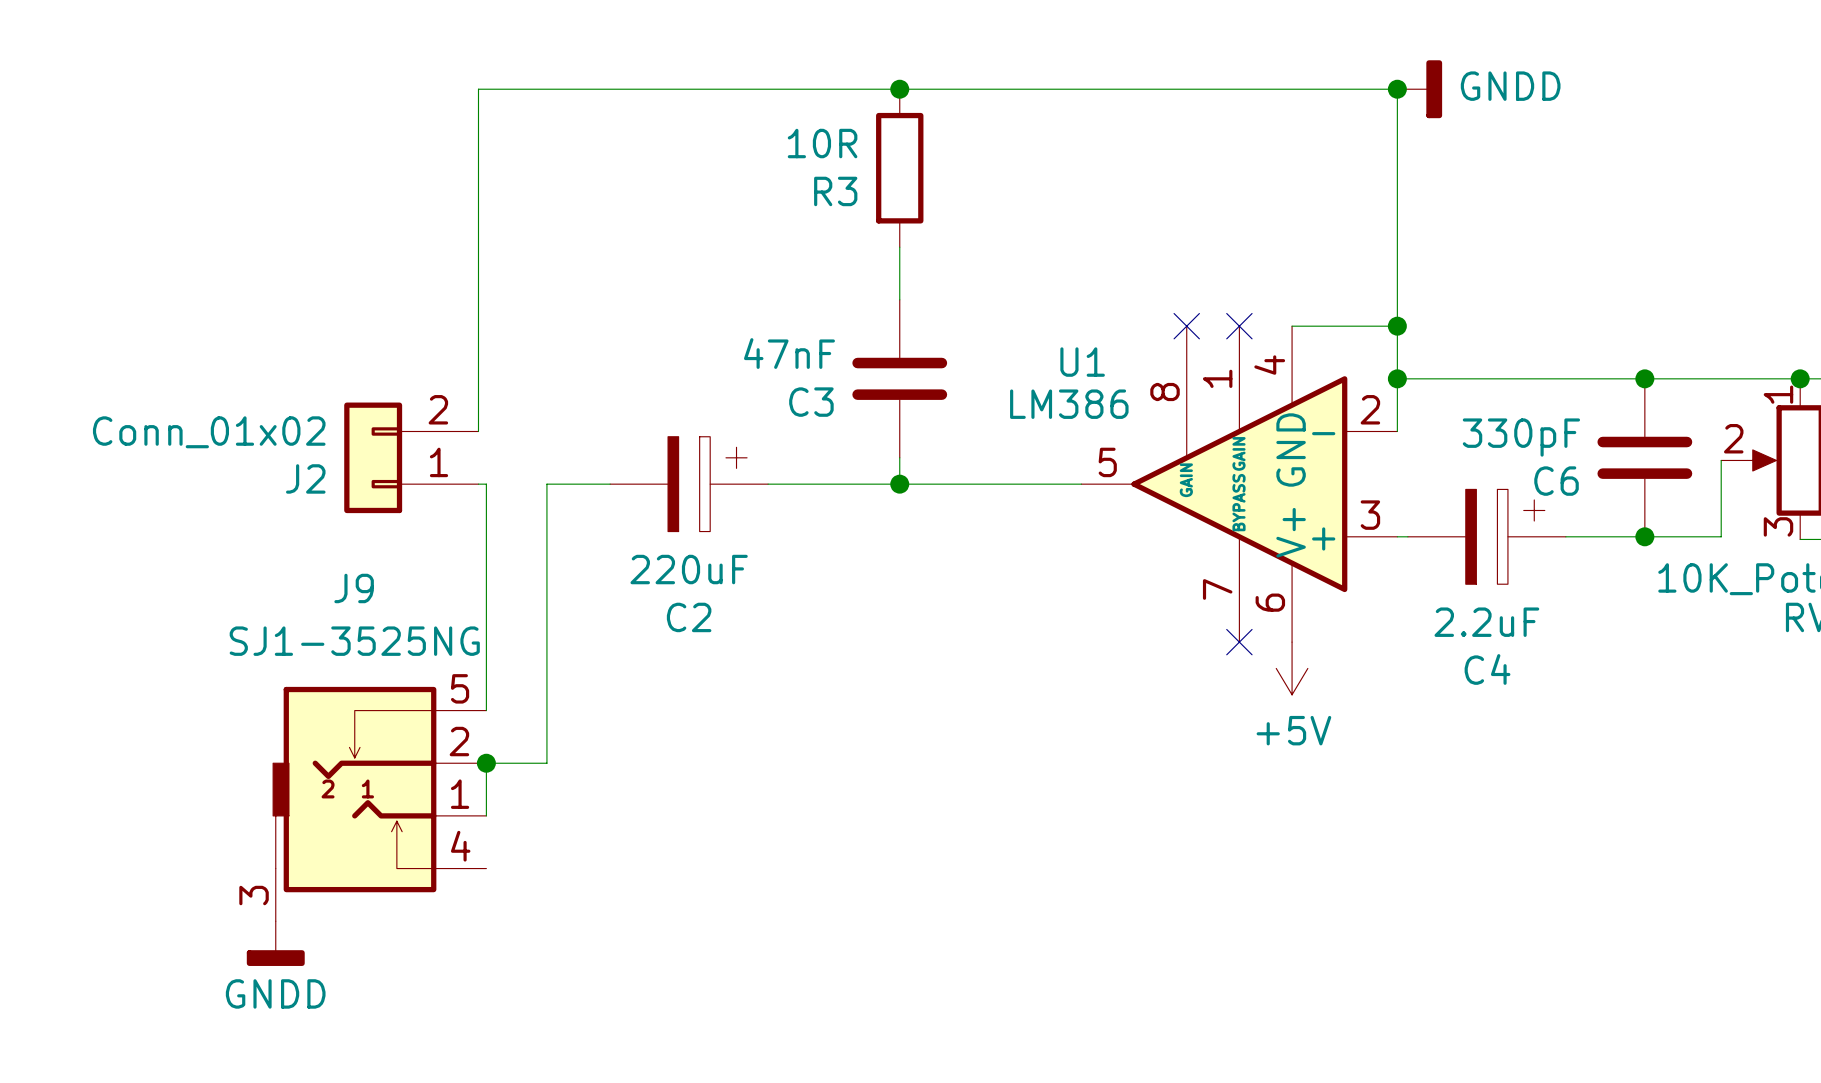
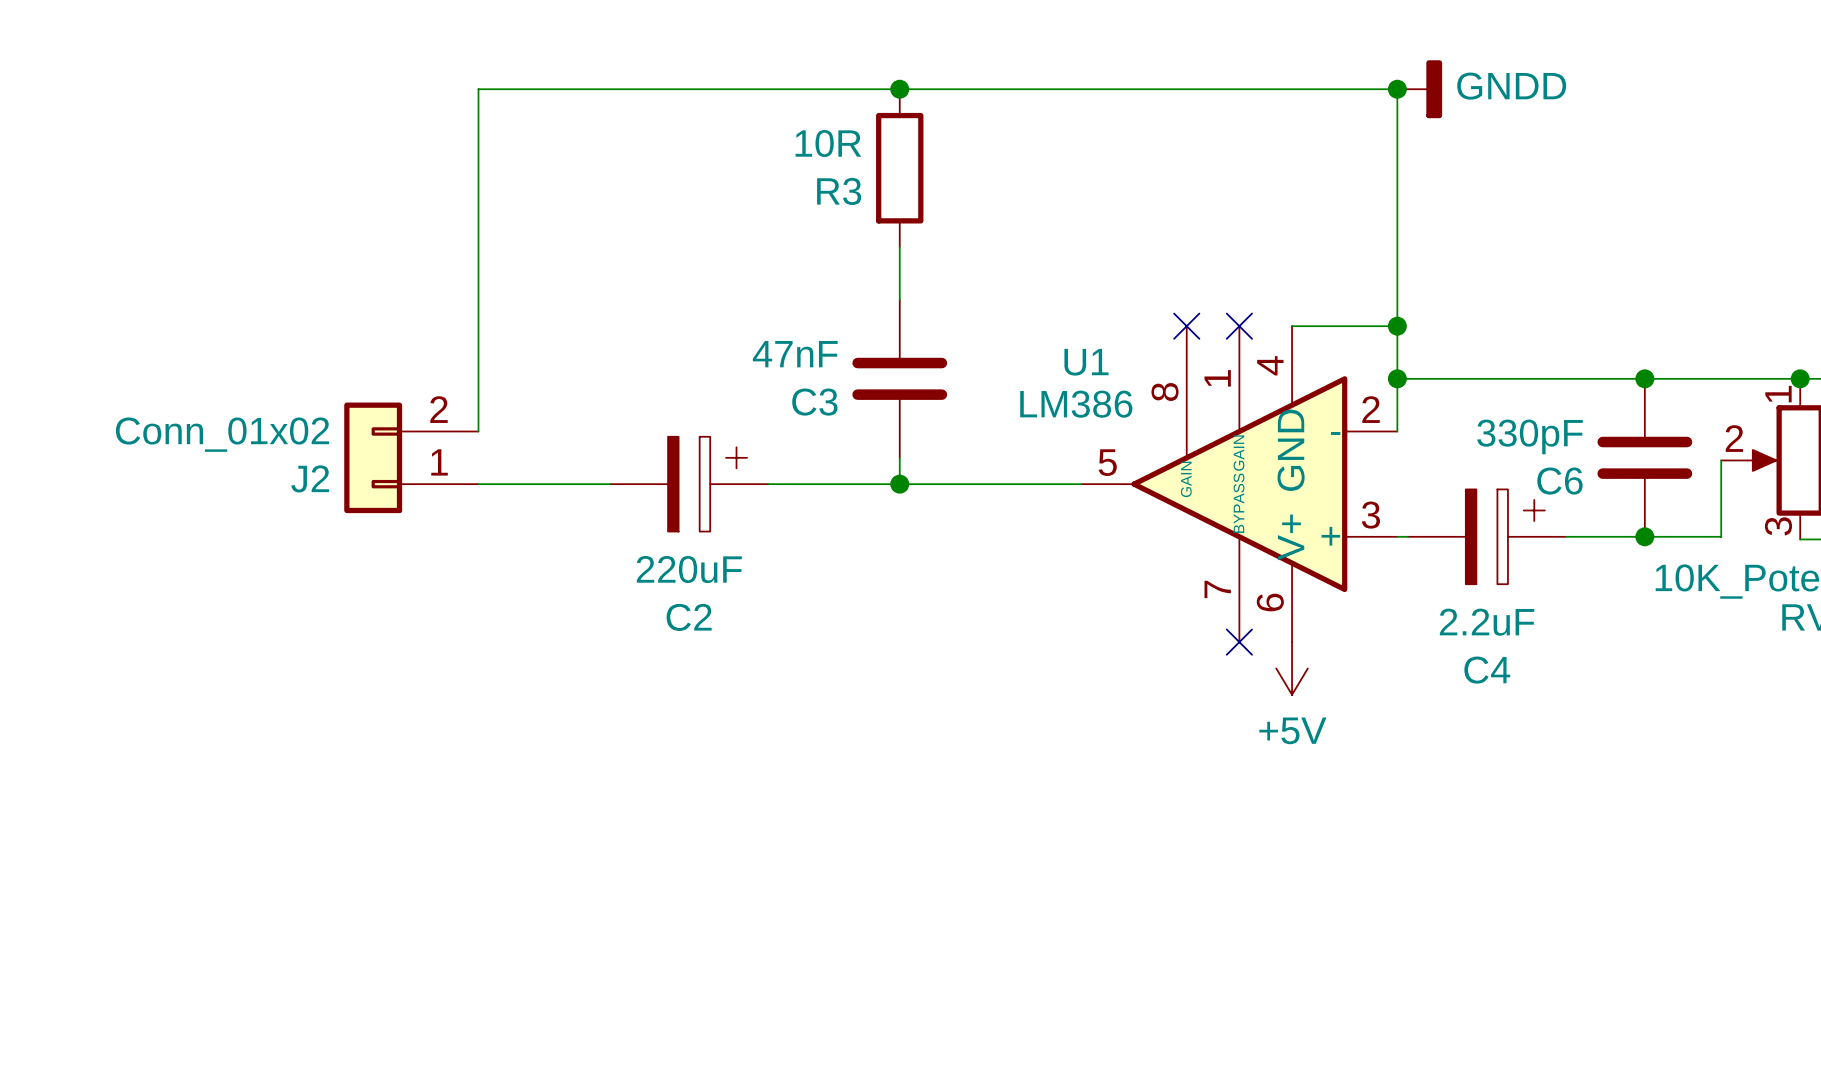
wire: (486, 484) (486, 710) -> (486, 484) (546, 484)
wire: (546, 484) (546, 763) (486, 763) (486, 815) -> none
junction: (486, 763) -> none
J9: SJ1-3525NG (379, 804) -> none
power symbol: GNDD (275, 943) -> none

